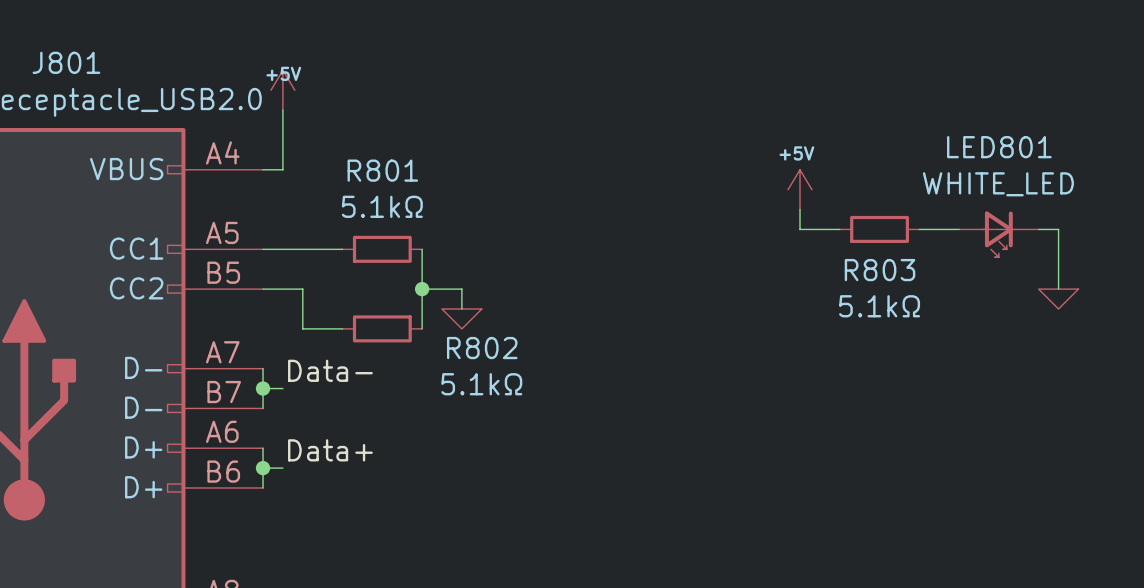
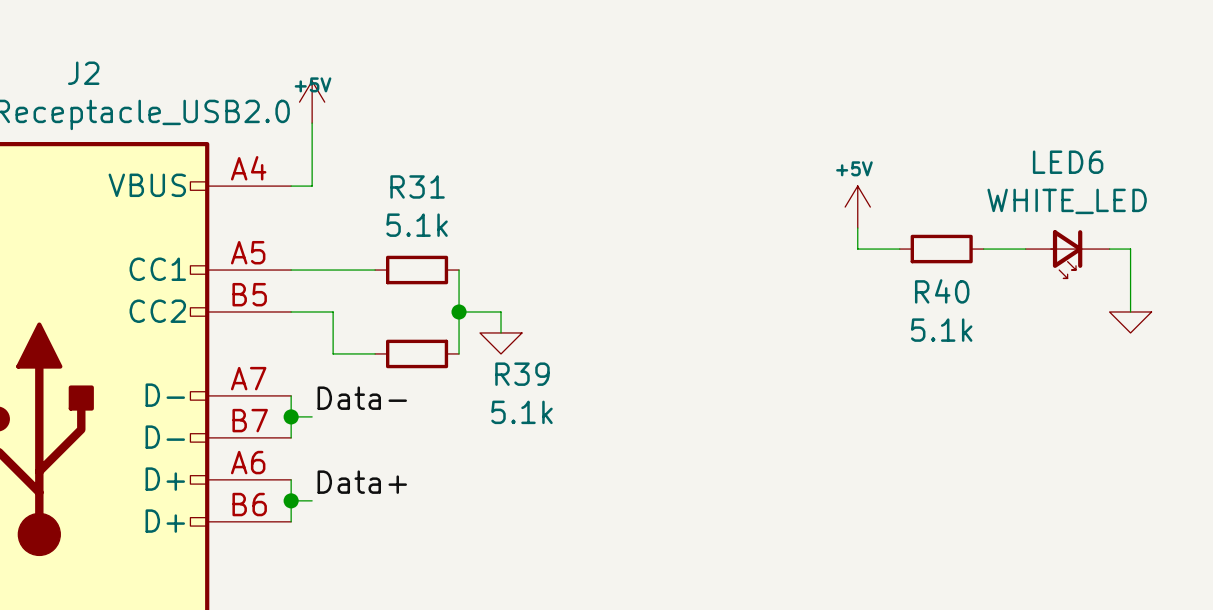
J801 name: J801 (66, 62) -> J2 (83, 73)
LED801 name: LED801 (999, 147) -> LED6 (1068, 162)
R801 name: R801 (382, 170) -> R31 (417, 186)
R801 value: 5.1kΩ (382, 206) -> 5.1k (417, 225)
R803 name: R803 (880, 270) -> R40 (942, 291)
R803 value: 5.1kΩ (879, 306) -> 5.1k (941, 330)
R802 name: R802 (482, 348) -> R39 (522, 374)
R802 value: 5.1kΩ (481, 384) -> 5.1k (521, 412)

